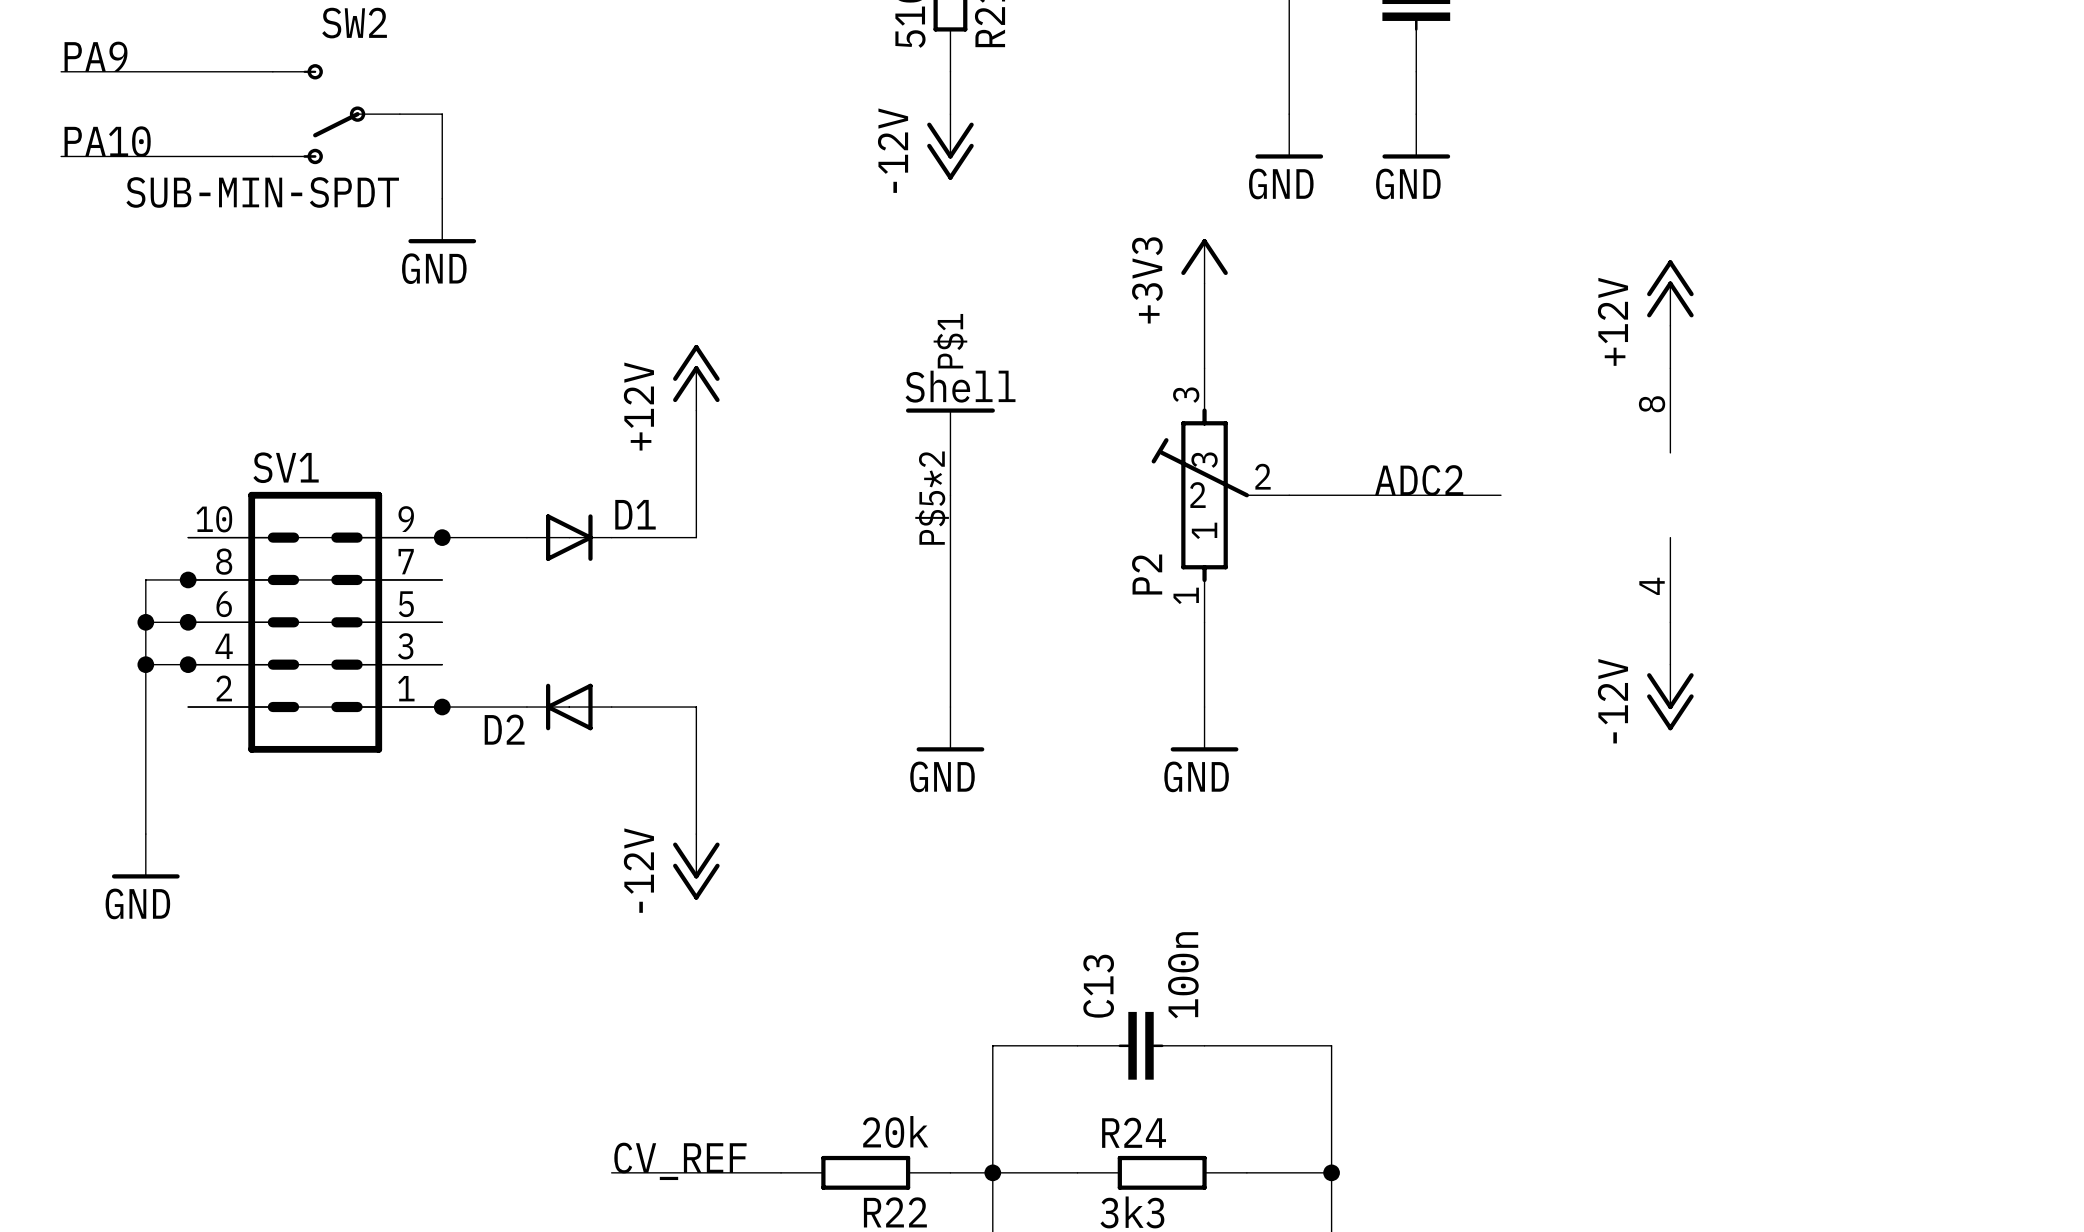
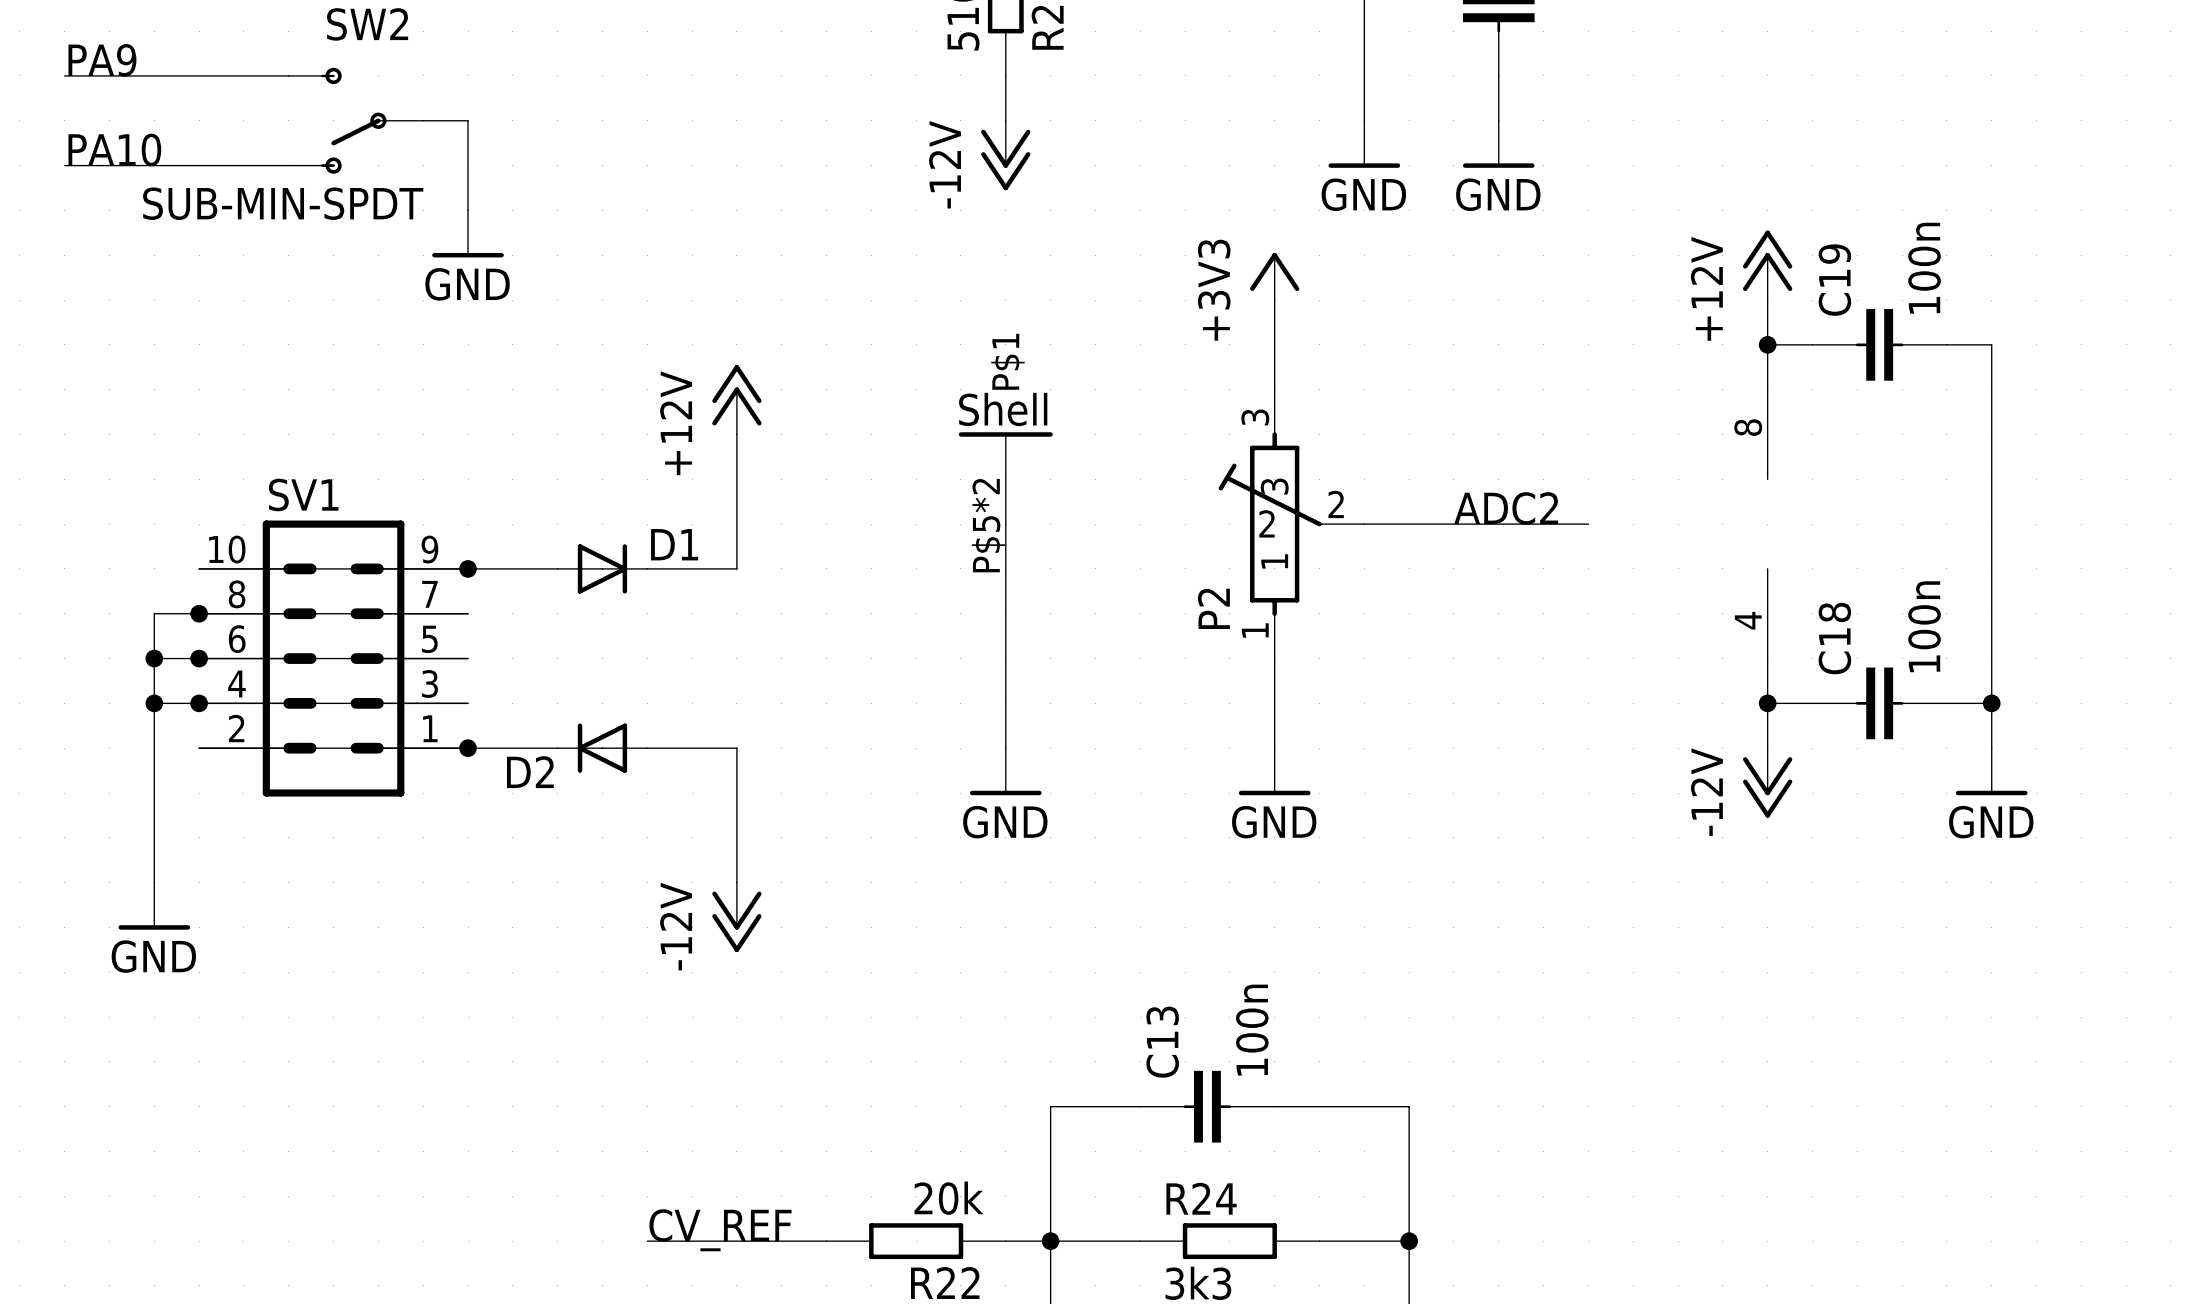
wire: none -> (1767, 300) (1767, 344) (1812, 344)
power symbol position: +12V (1670, 293) -> +12V (1767, 265)
junction: none -> (1767, 344)
C19: none -> 100n (1879, 344)
wire: none -> (1946, 344) (1991, 344) (1991, 748)
junction: none -> (1767, 703)
wire: none -> (1812, 703) (1767, 703) (1767, 748)
C18: none -> 100n (1879, 703)
wire: none -> (1946, 703) (1991, 703)
junction: none -> (1991, 703)
power symbol position: -12V (1670, 697) -> -12V (1767, 782)
power symbol: none -> GND (1991, 771)

